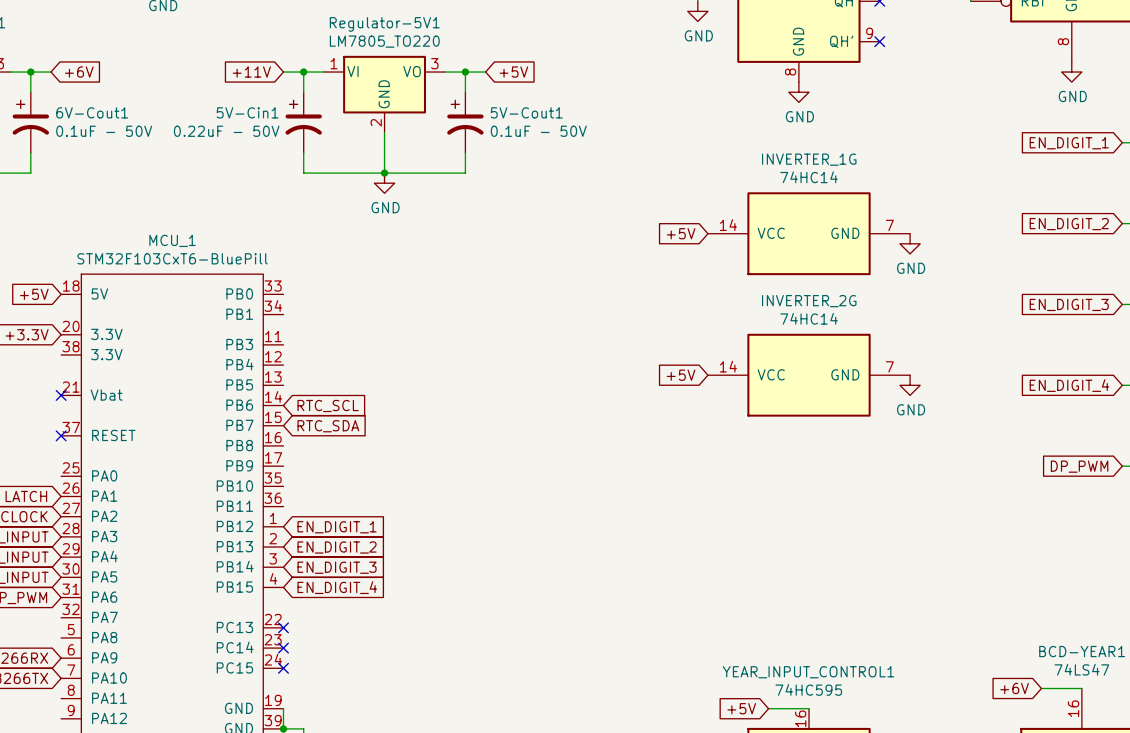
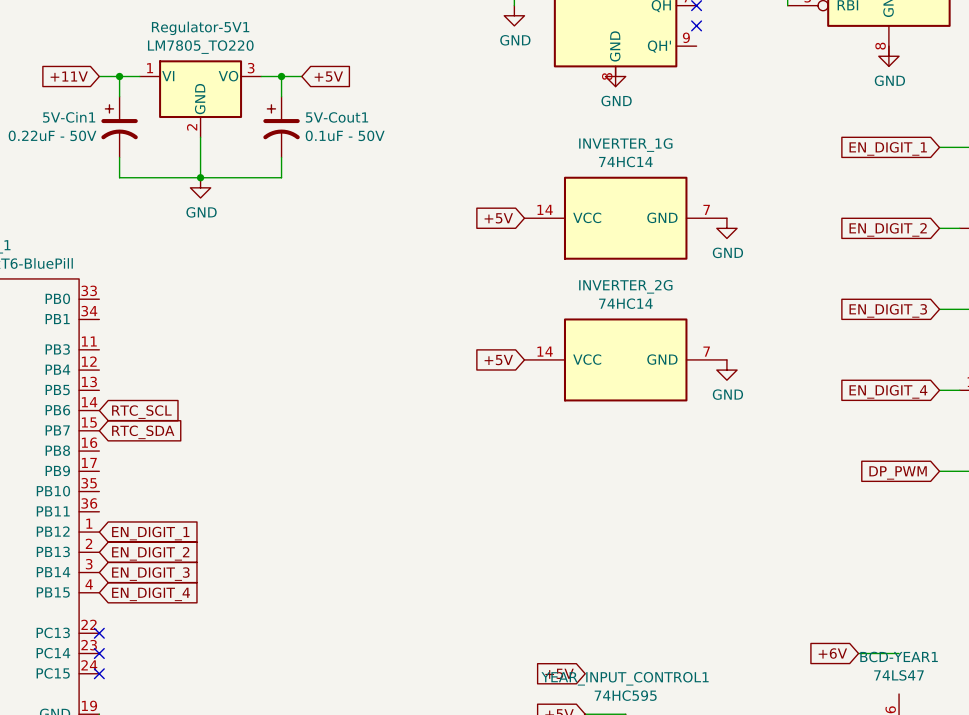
no-connect mark position: (879, 41) -> (696, 25)
power symbol position: GND (1071, 72) -> GND (888, 56)
power symbol position: GND (798, 92) -> GND (615, 76)
global label position: +5V (681, 233) -> +5V (498, 218)
INVERTER_1G position: (809, 233) -> (625, 218)
power symbol position: GND (910, 243) -> GND (726, 228)
global label position: +5V (681, 375) -> +5V (498, 360)
INVERTER_2G position: (809, 375) -> (625, 359)
power symbol position: GND (910, 385) -> GND (726, 370)
global label: none -> +5V (559, 673)
global label position: +6V (1014, 688) -> +6V (832, 653)
wire: (1041, 688) (1081, 688) -> (858, 653) (899, 653)

